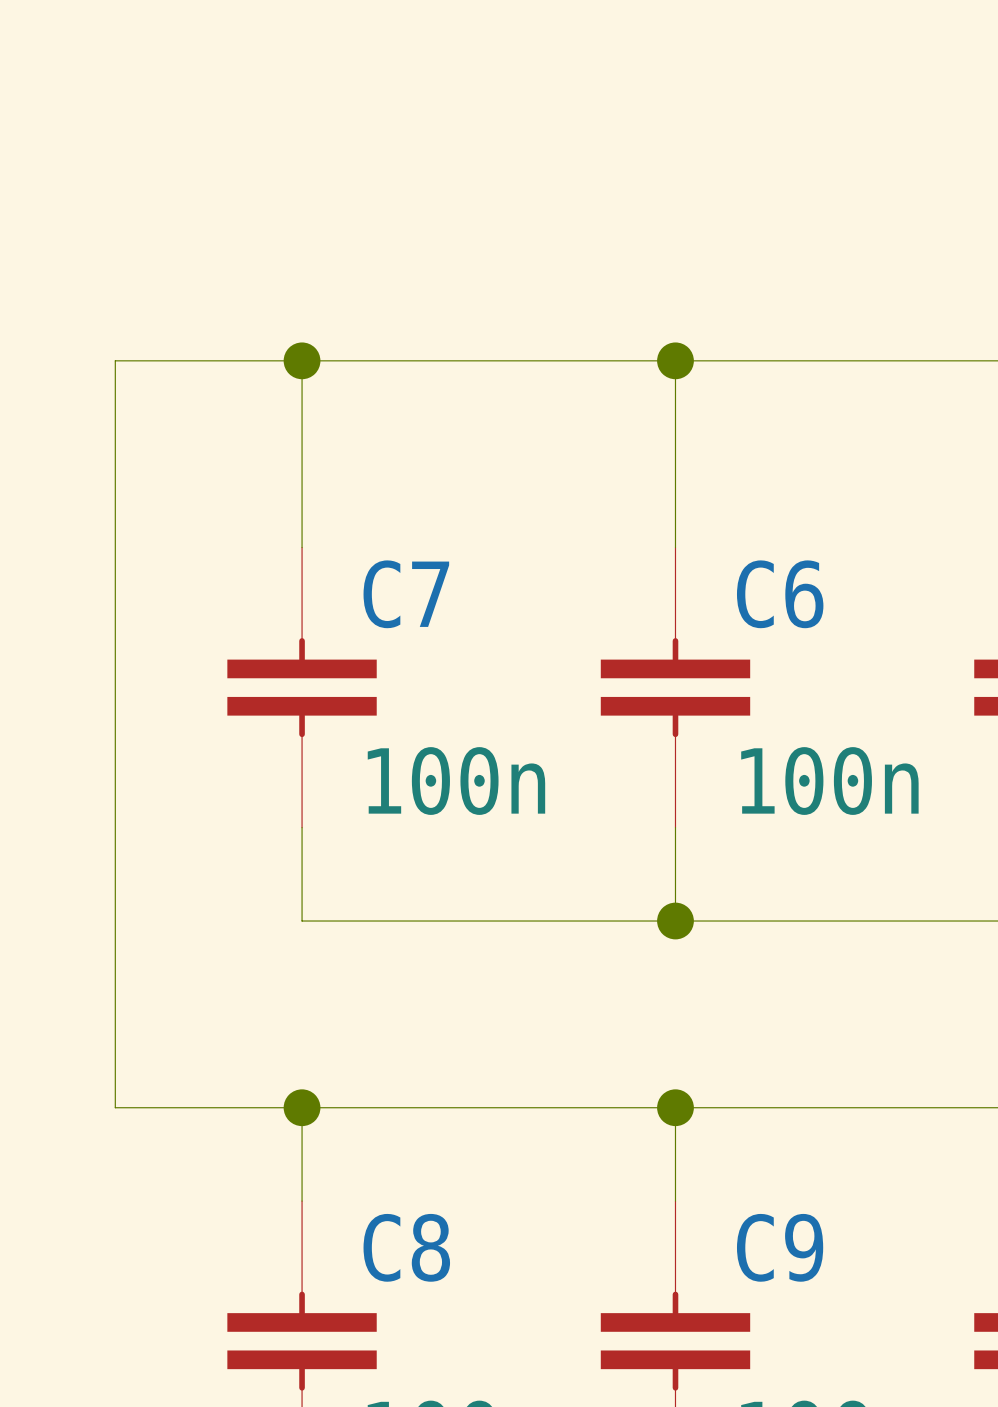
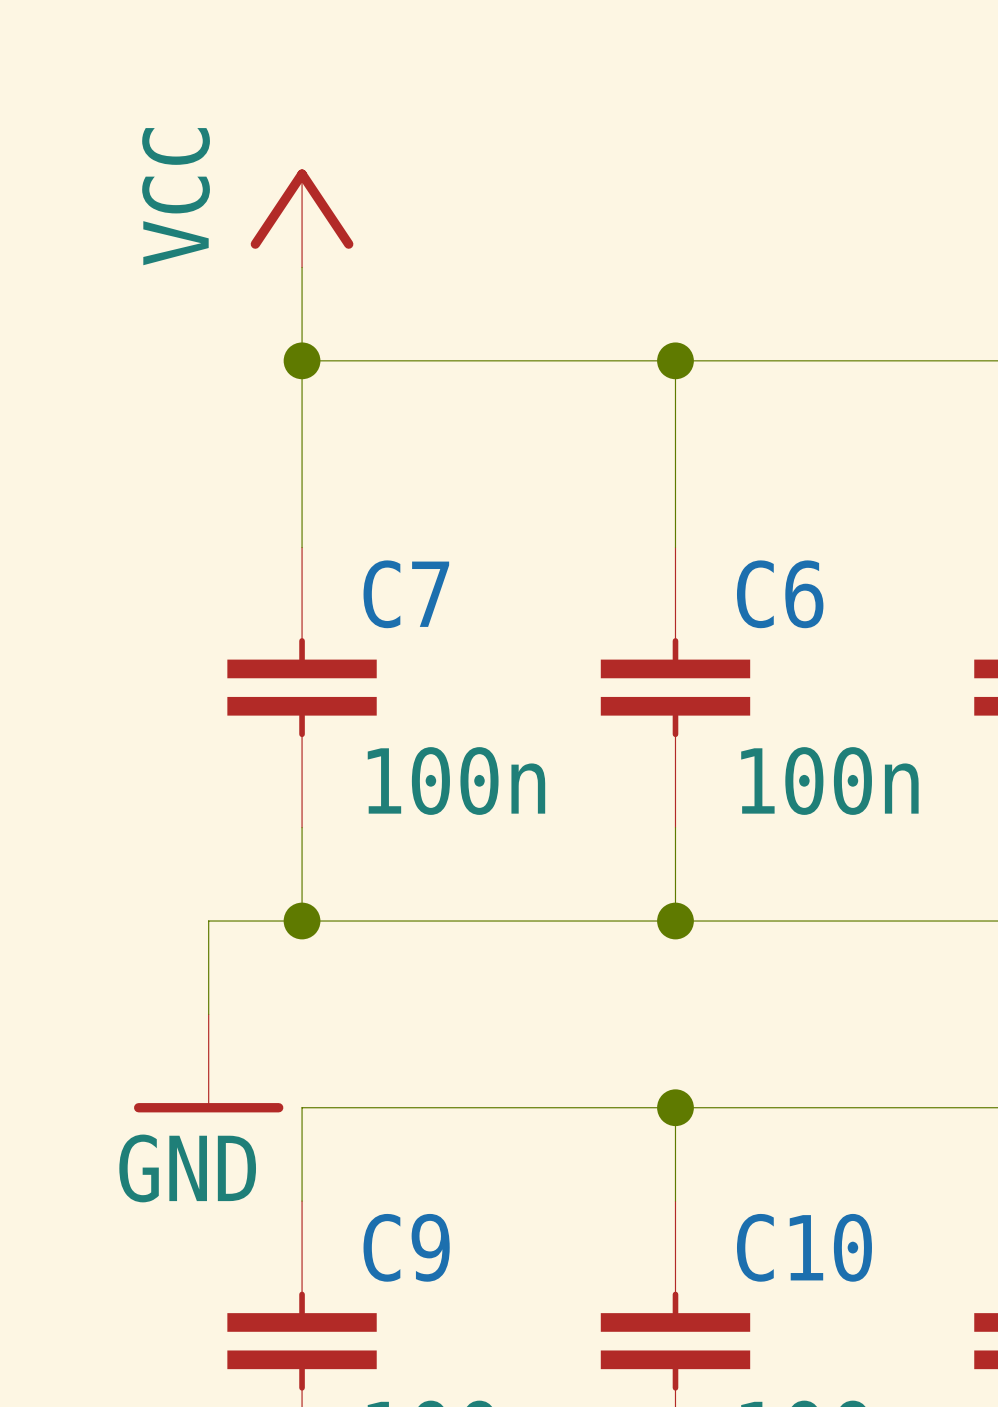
power symbol: none -> VCC (302, 218)
wire: (302, 360) (115, 360) (115, 1107) (302, 1107) -> (302, 360) (302, 267)
wire: none -> (302, 921) (208, 921) (208, 1014)
power symbol: none -> GND (208, 1063)
junction position: (302, 1107) -> (302, 921)
C8 name: C8 (406, 1247) -> C9 (406, 1247)
C9 name: C9 (780, 1247) -> C10 (804, 1247)

